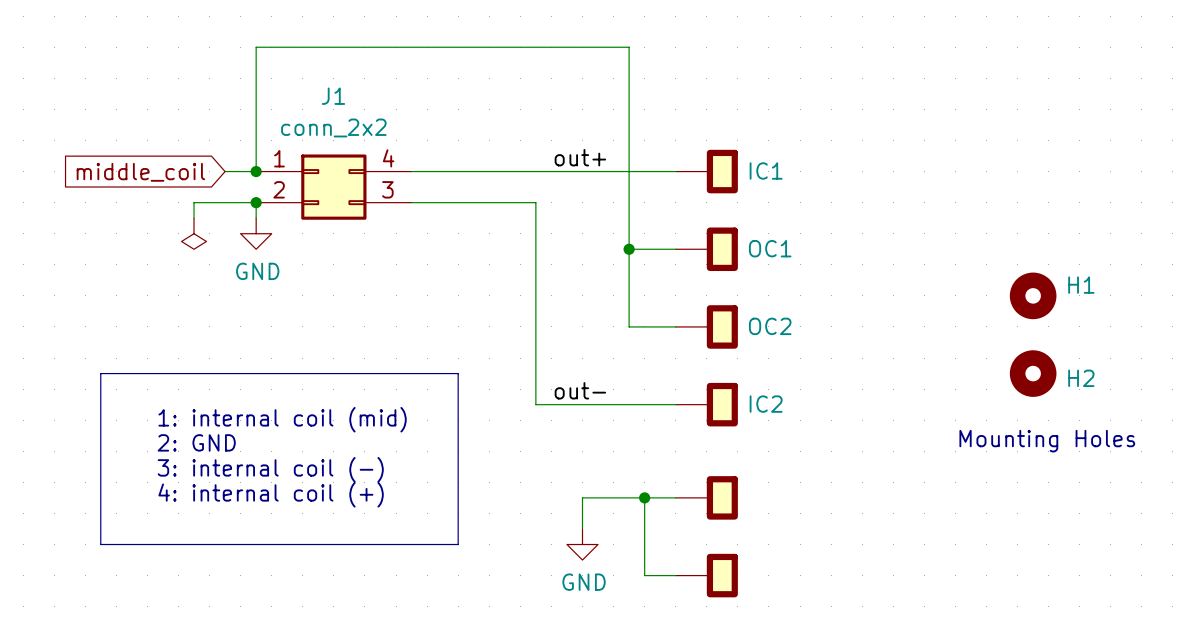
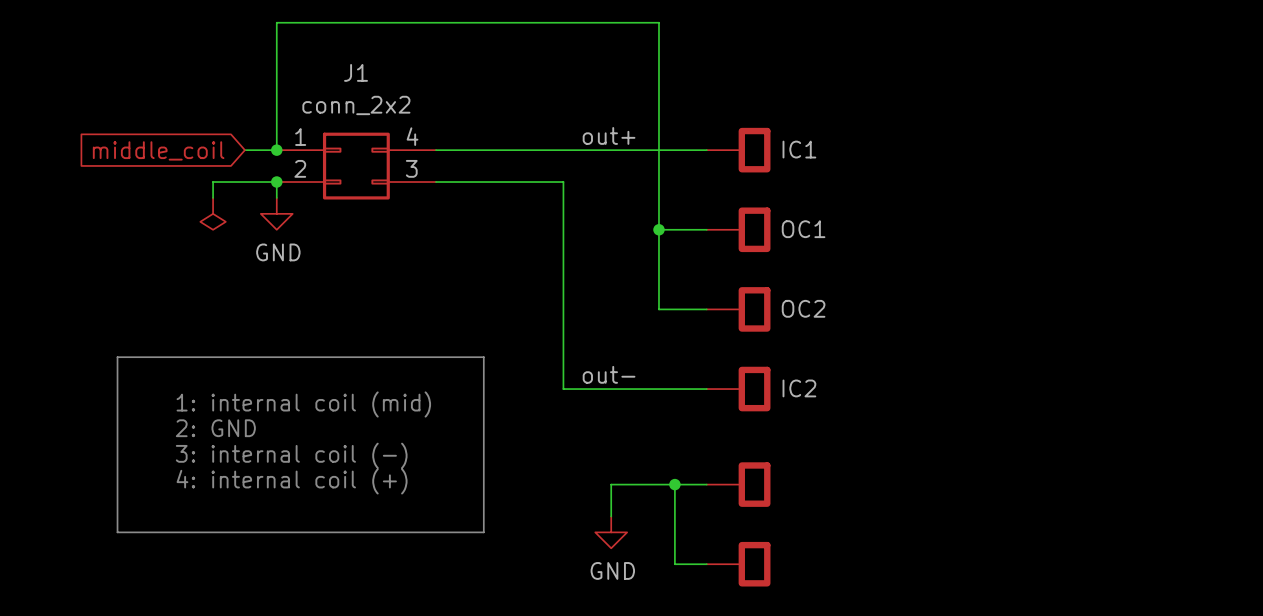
H1: (1033, 295) -> none
H2: (1033, 373) -> none
text: Mounting Holes (1047, 441) -> none

